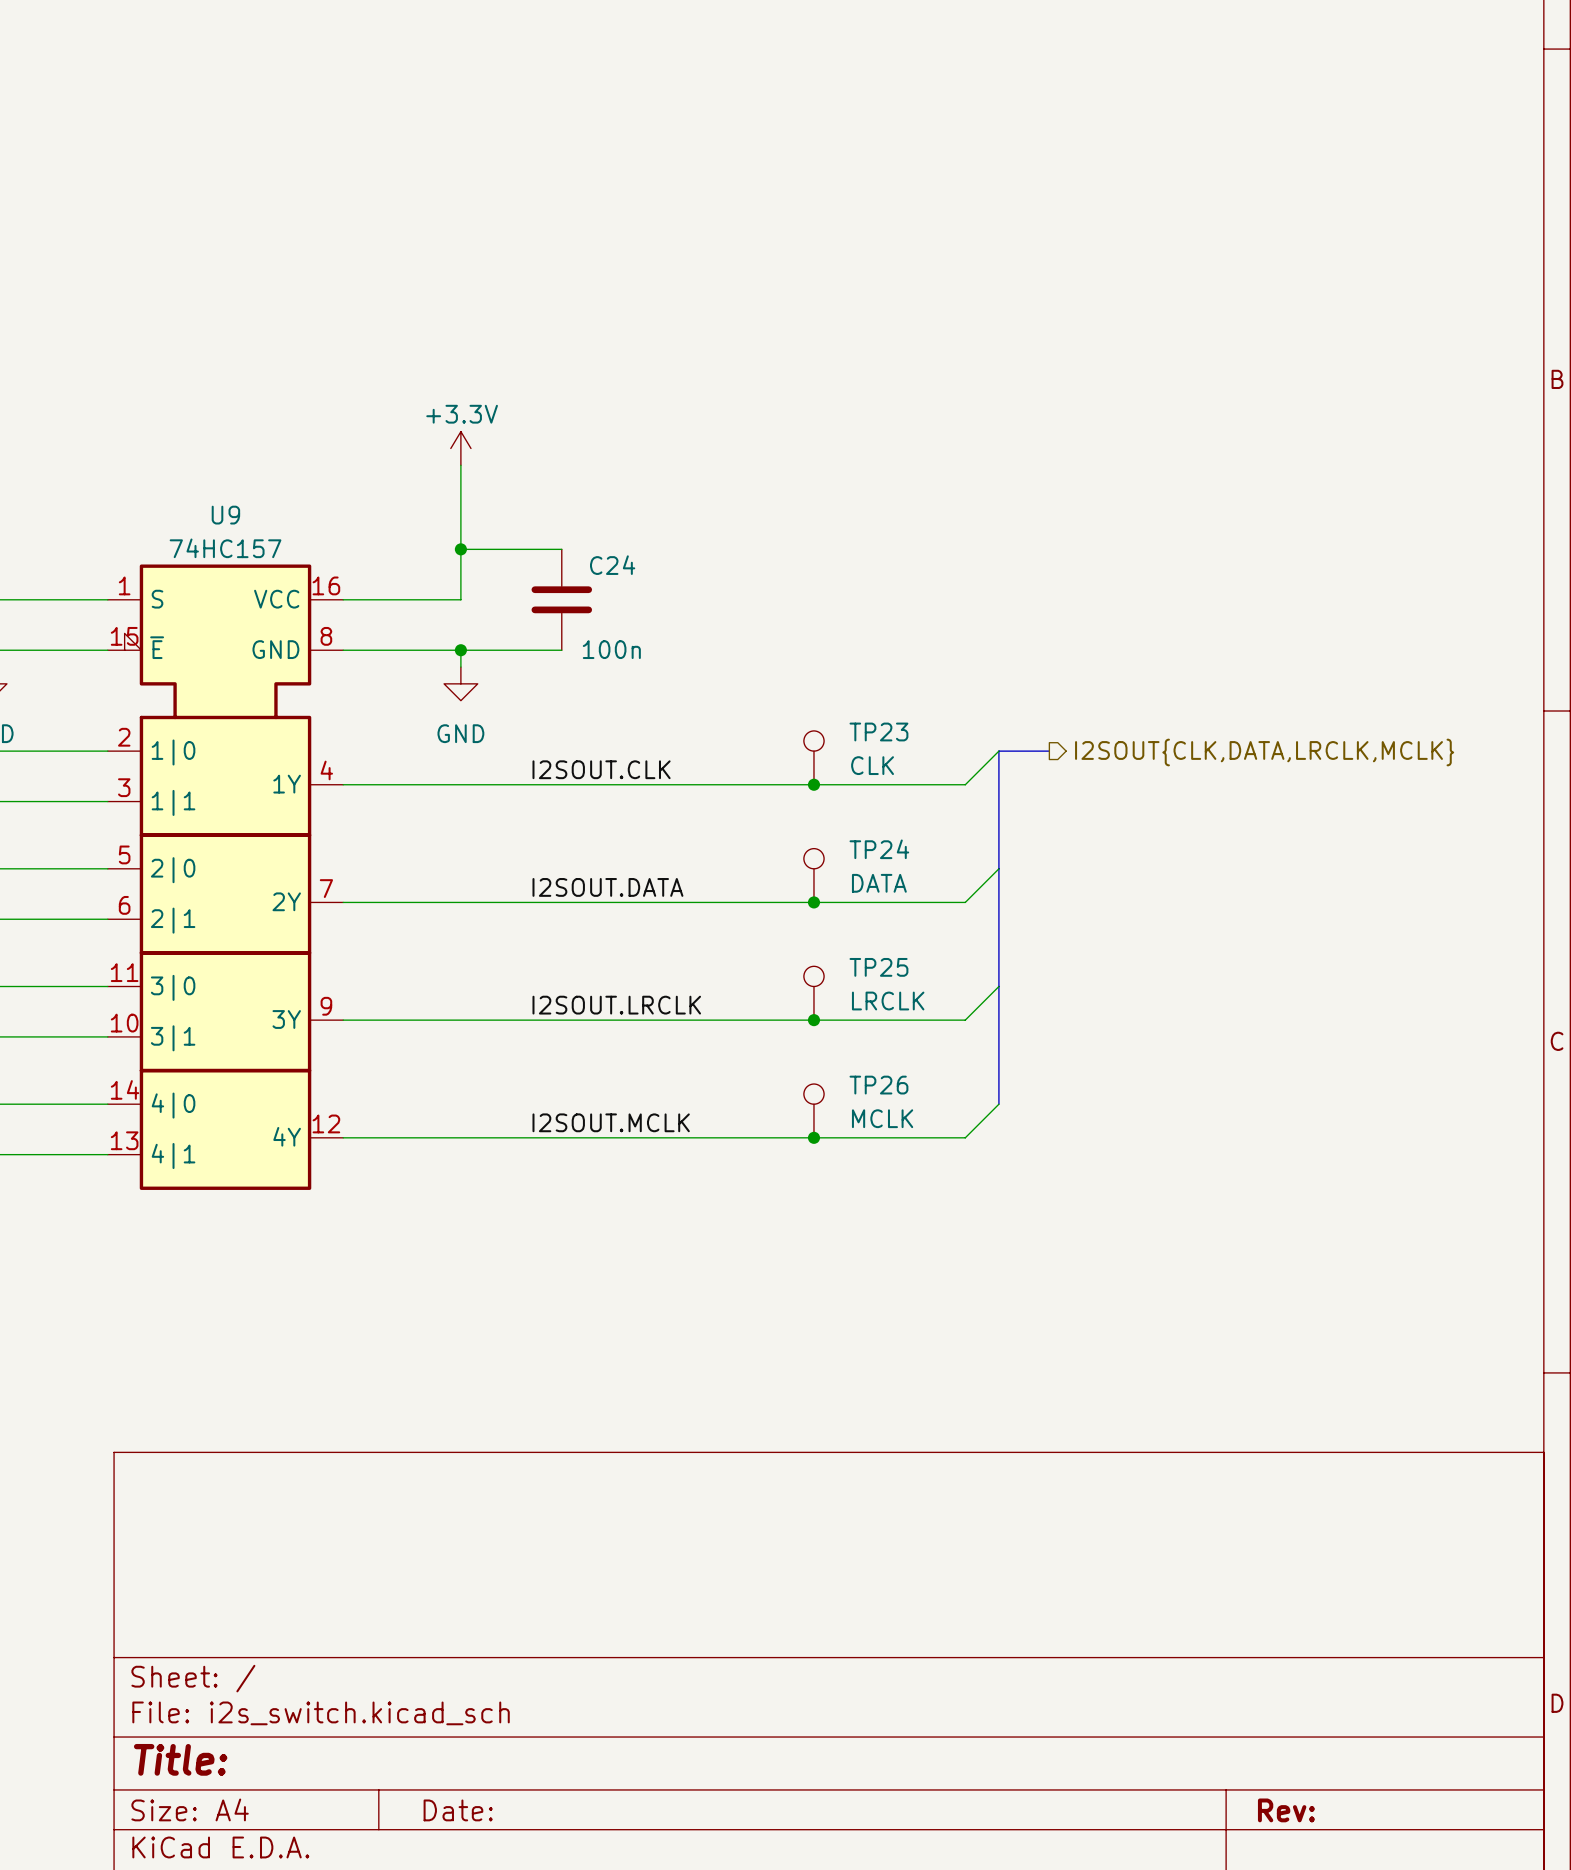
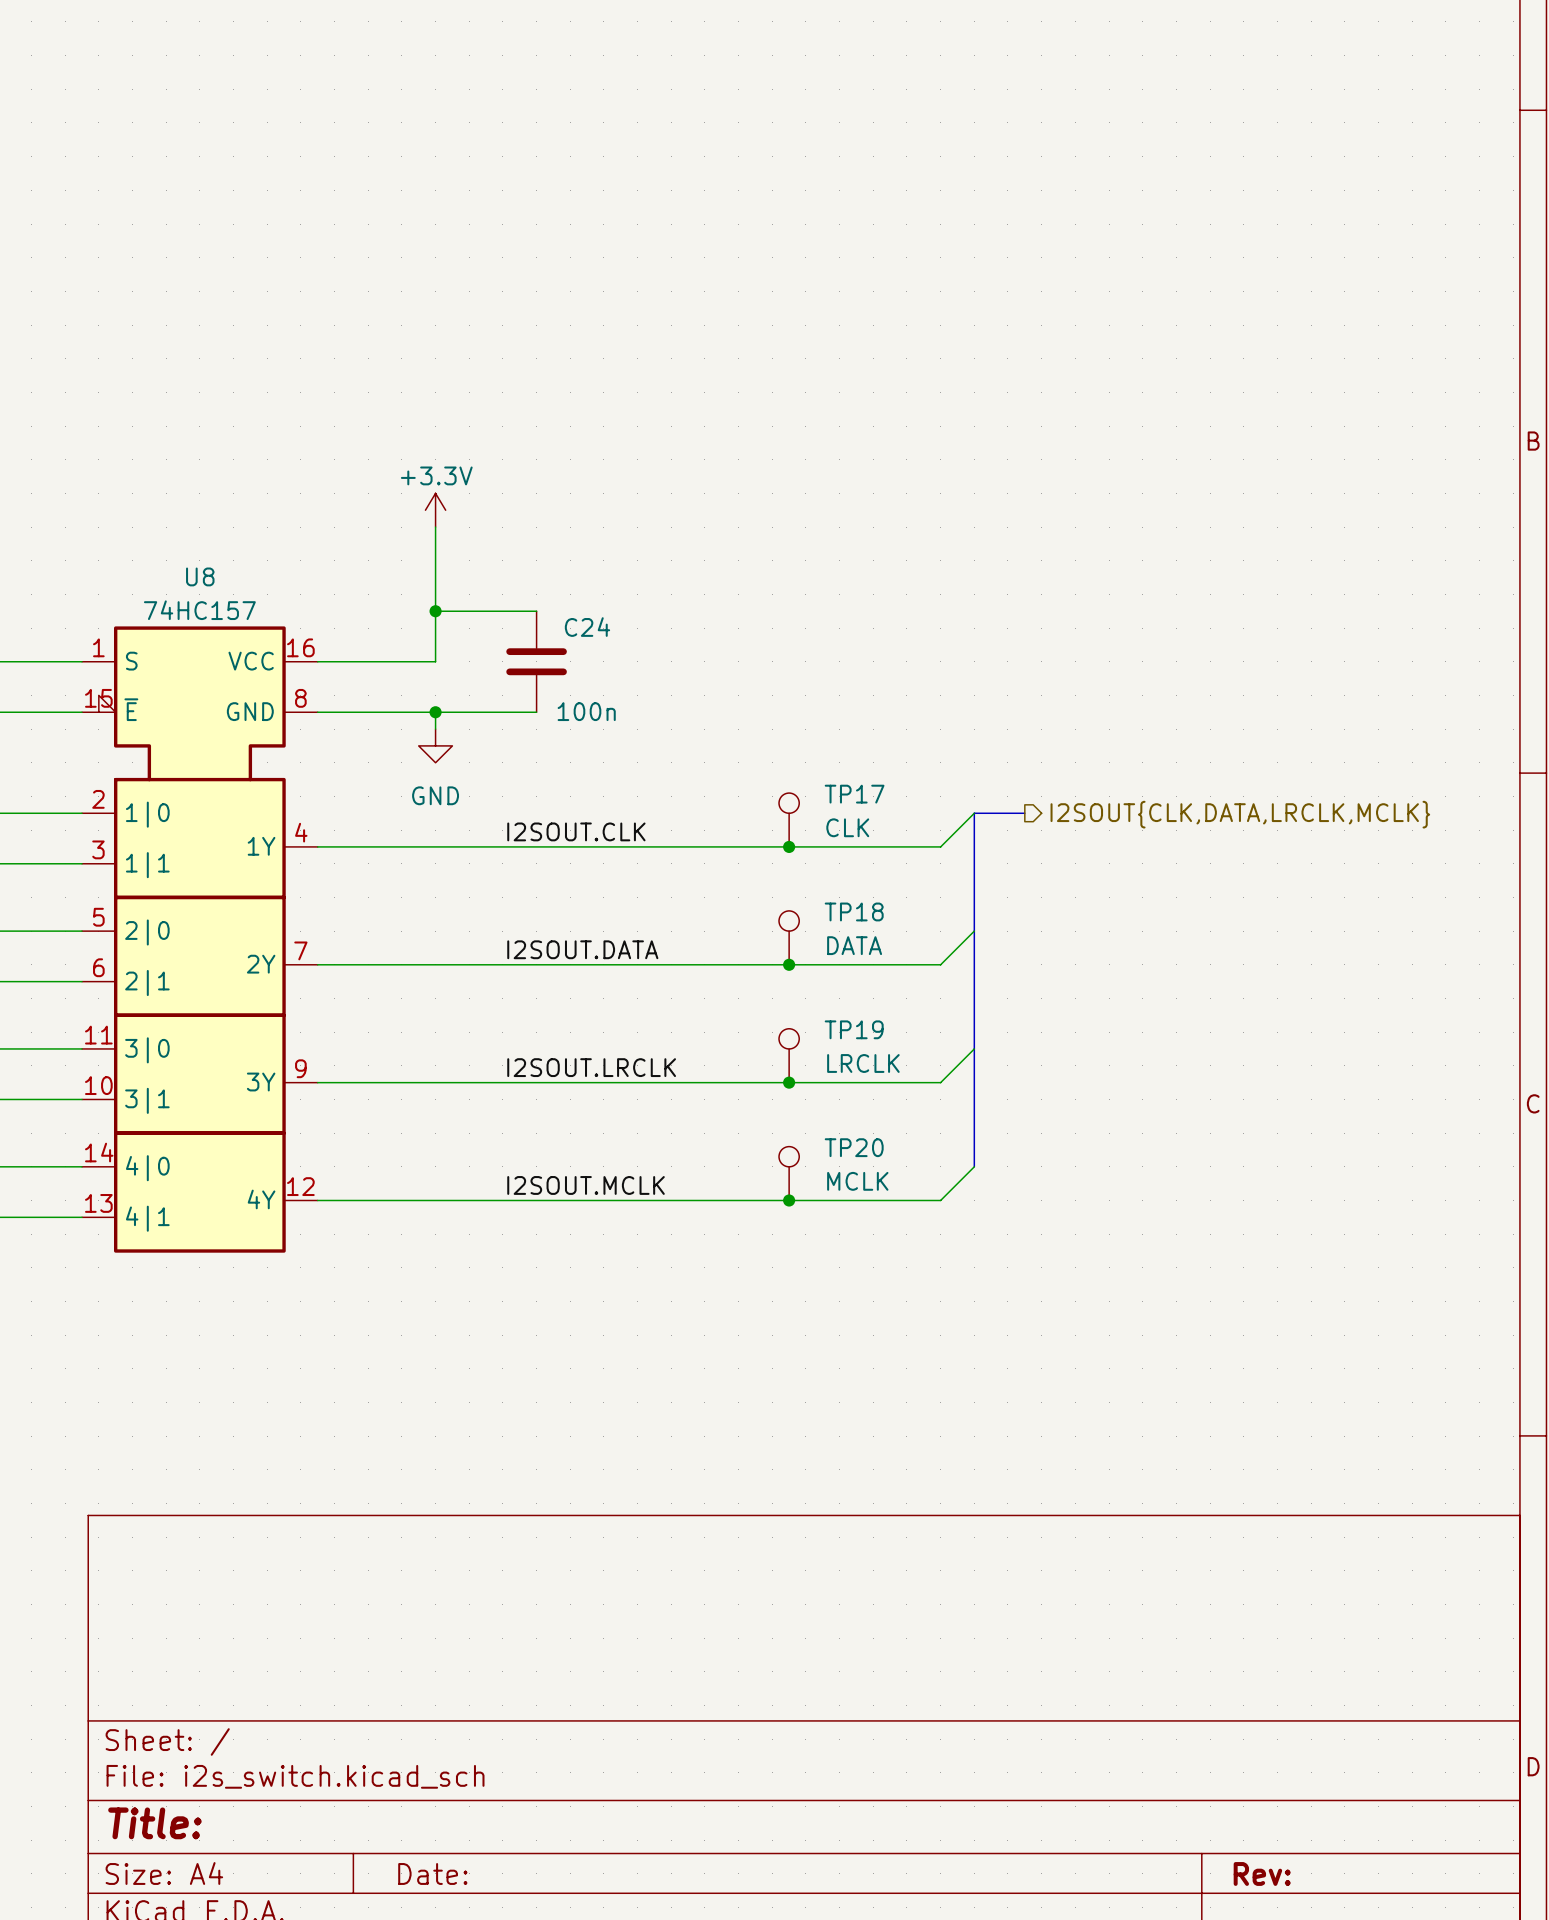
U9 name: U9 (225, 515) -> U8 (200, 576)
TP23 name: TP23 (878, 731) -> TP17 (854, 794)
TP24 name: TP24 (879, 849) -> TP18 (854, 911)
TP25 name: TP25 (878, 967) -> TP19 (854, 1029)
TP26 name: TP26 (878, 1085) -> TP20 (854, 1147)

